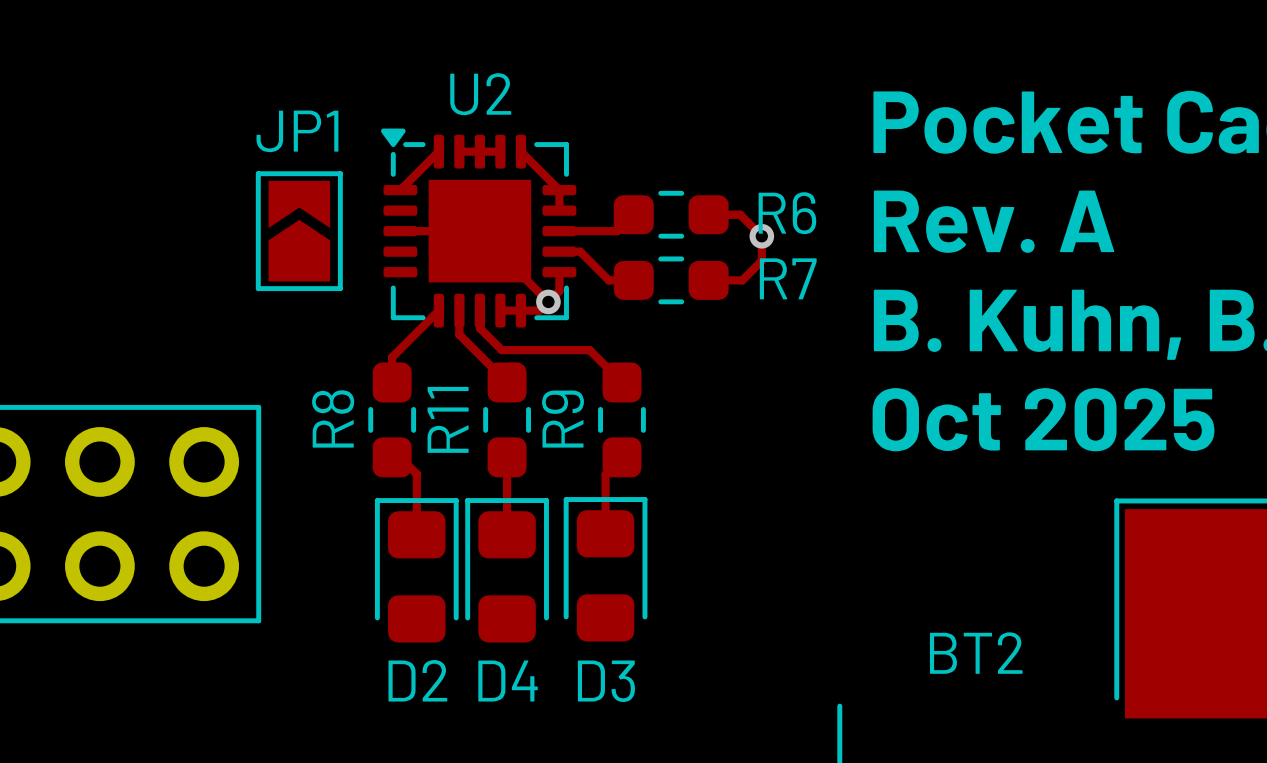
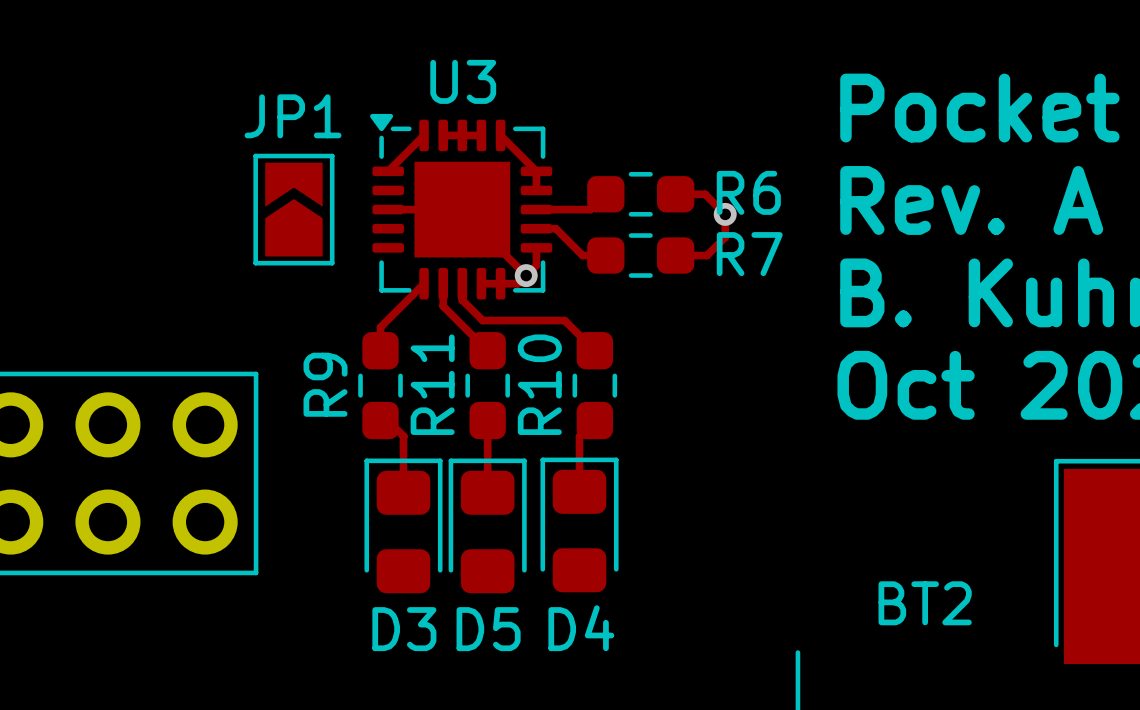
U2 name: U2 (480, 94) -> U3 (463, 81)
R8 name: R8 (333, 418) -> R9 (325, 384)
R9 name: R9 (563, 419) -> R10 (539, 384)
D2 name: D2 (417, 680) -> D3 (404, 629)
D4 name: D4 (508, 681) -> D5 (488, 629)
D3 name: D3 (606, 681) -> D4 (581, 628)

